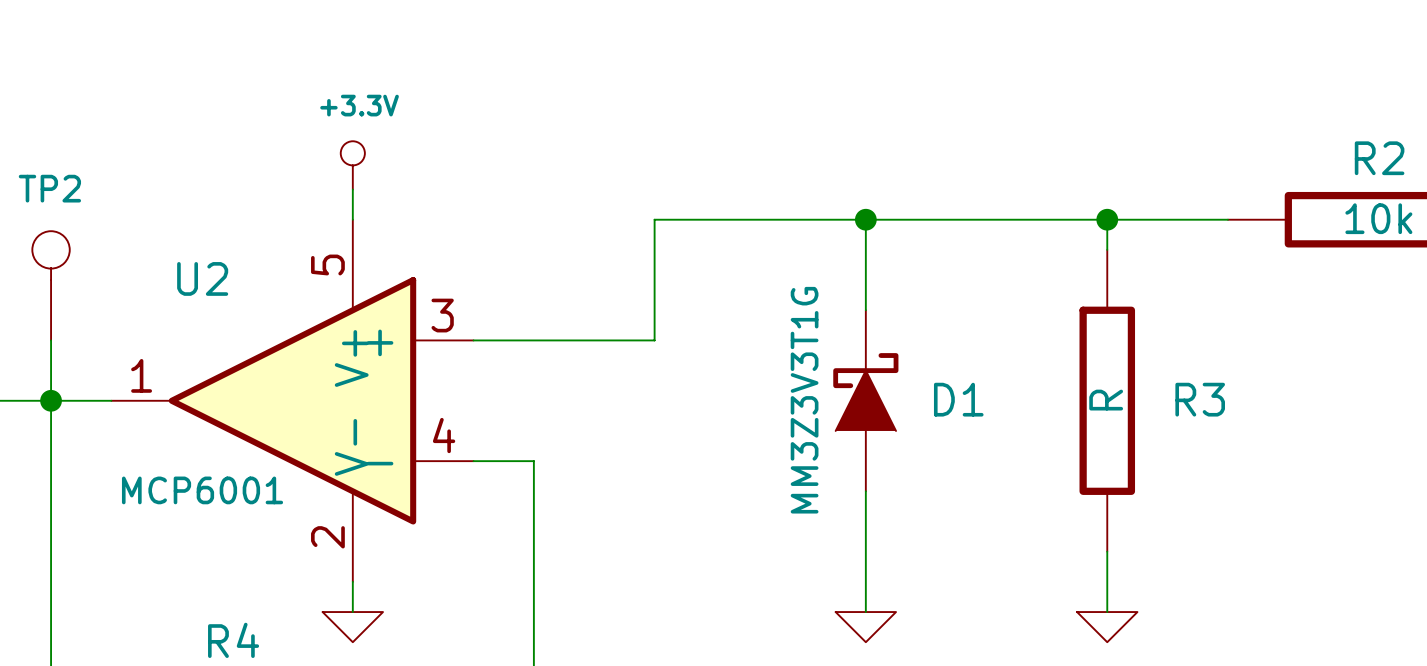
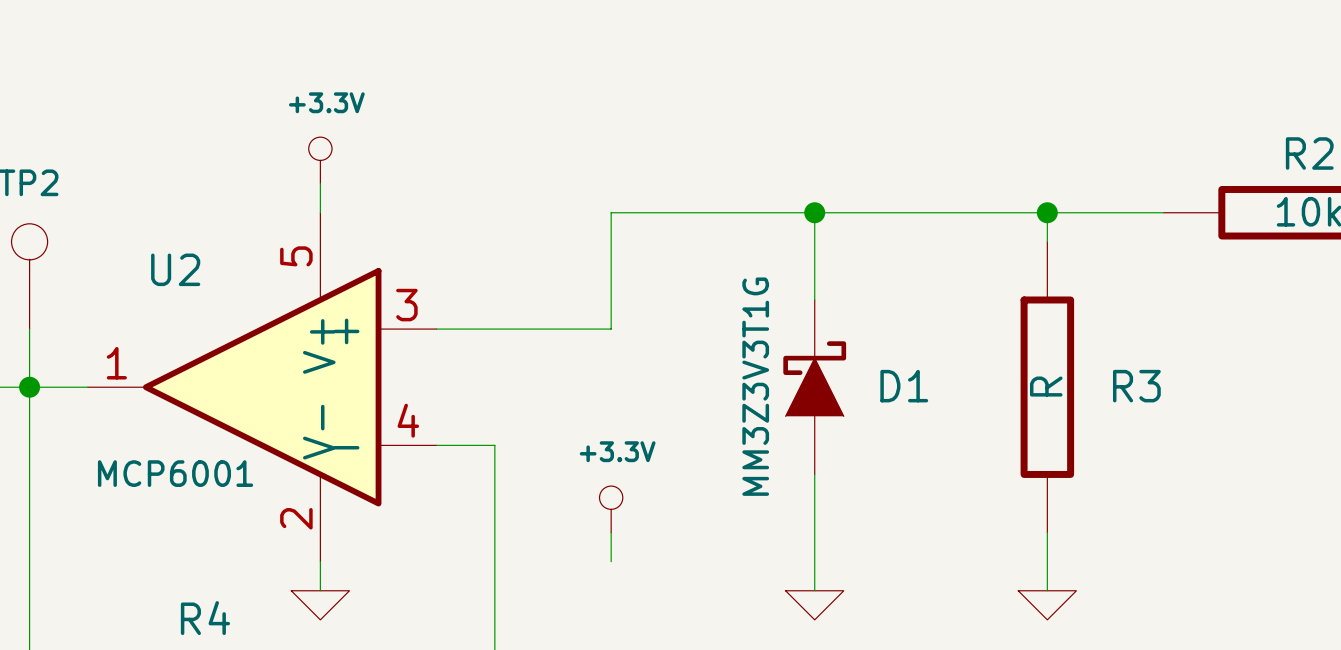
power symbol: none -> +3.3V (611, 509)
wire: none -> (611, 532) (611, 561)

